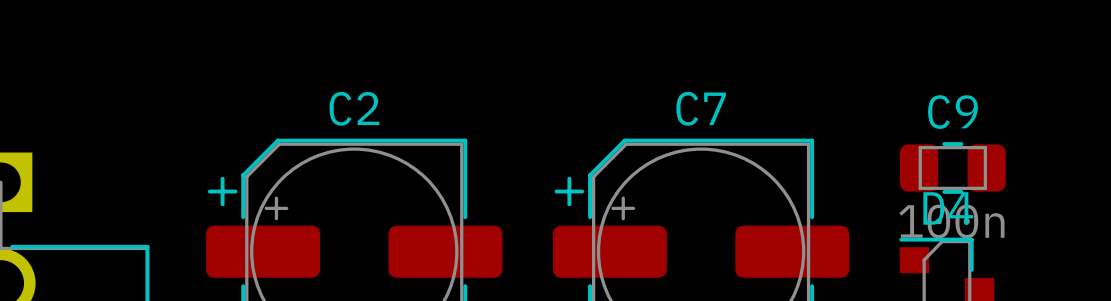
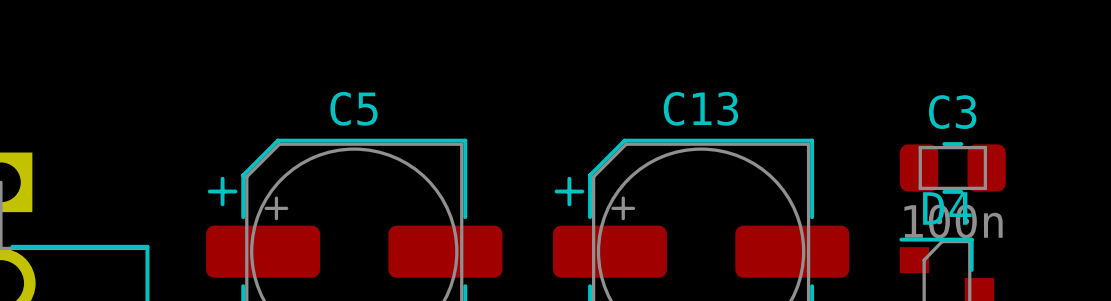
C2 name: C2 (354, 108) -> C5 (353, 108)
C7 name: C7 (701, 108) -> C13 (700, 108)
C9 name: C9 (952, 112) -> C3 (952, 112)

